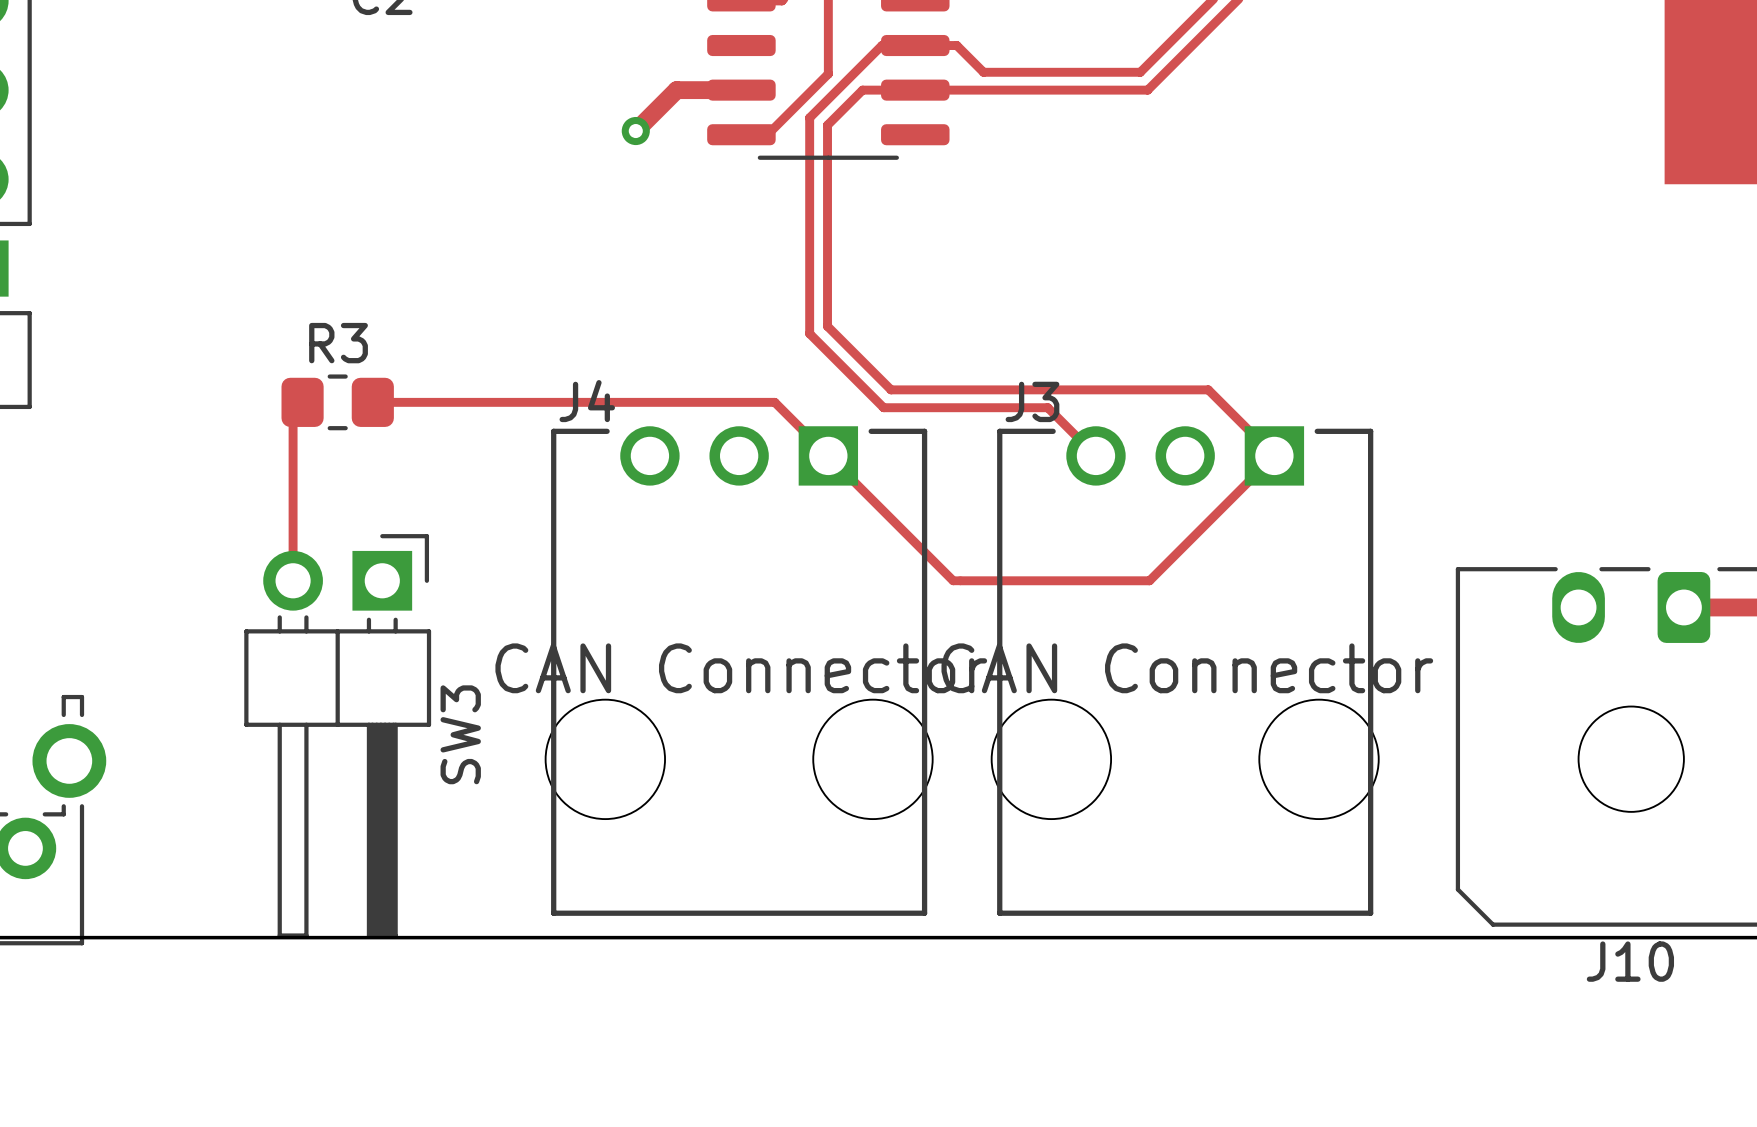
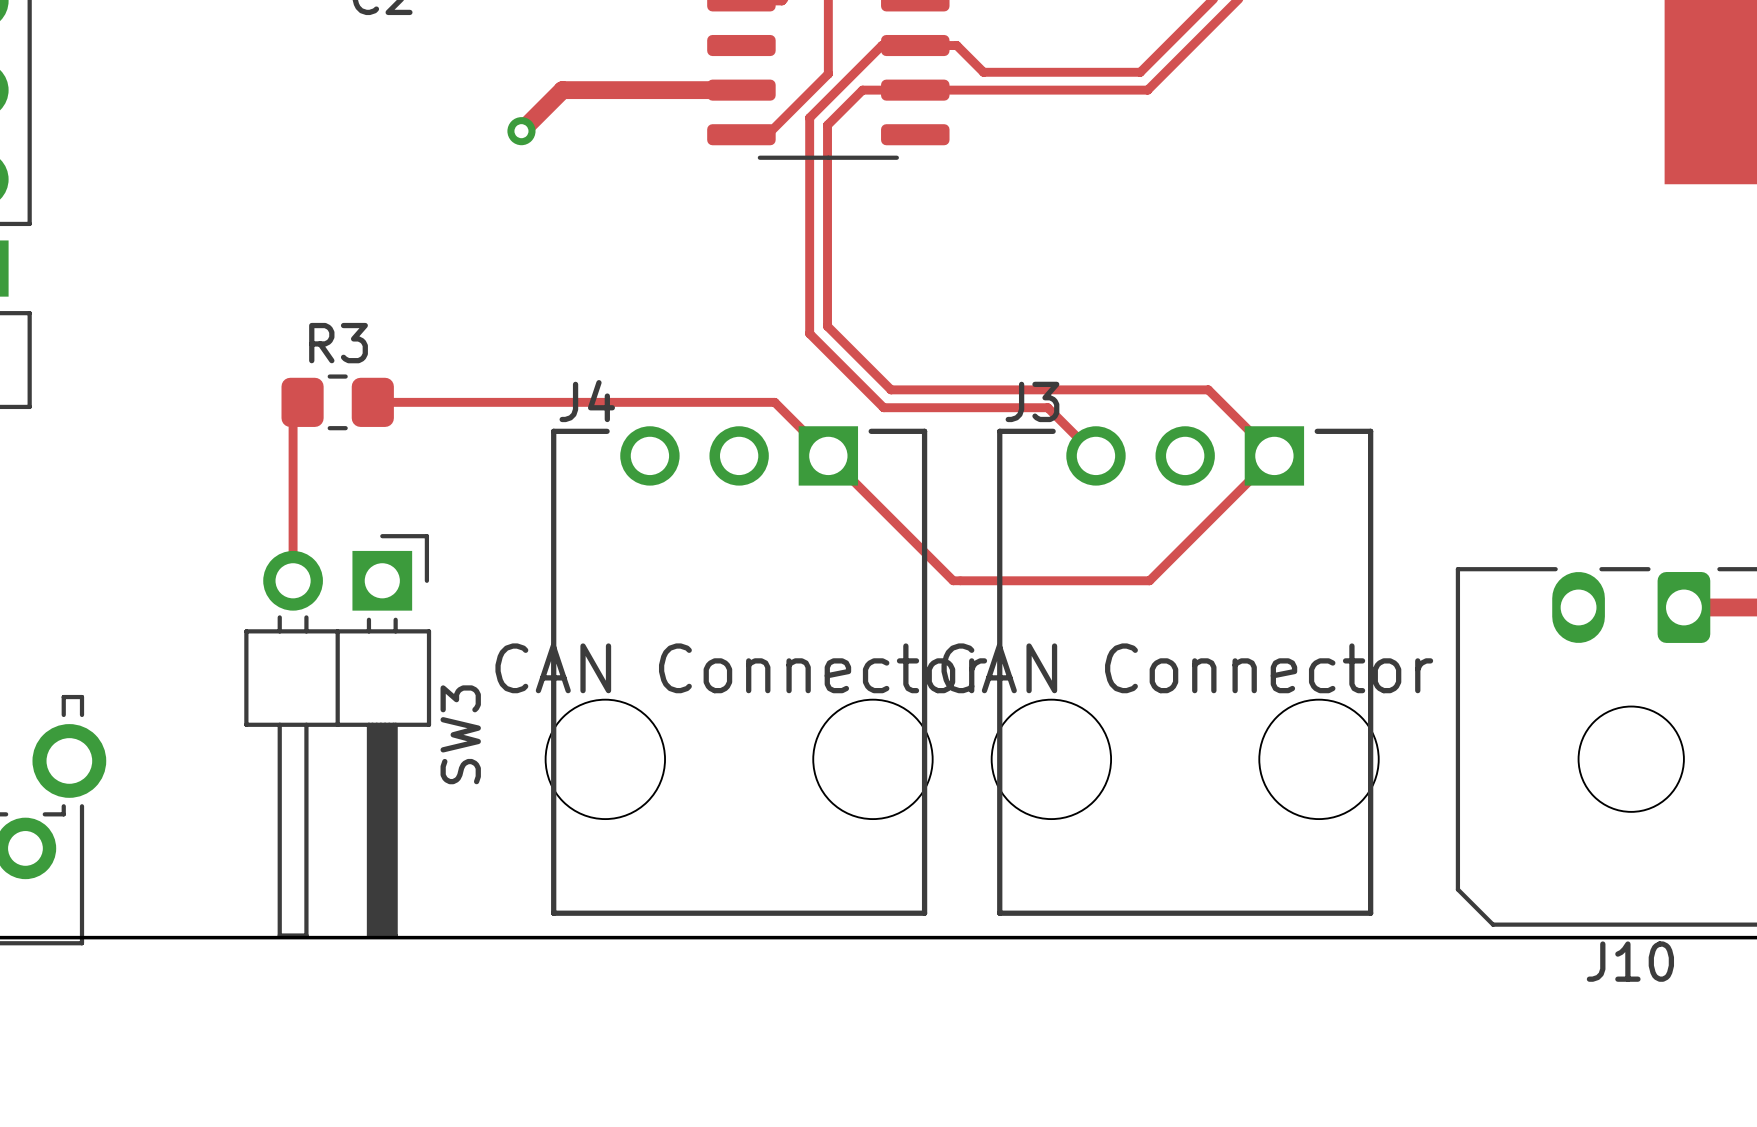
track: (676, 90) (635, 131) -> (676, 90) (562, 90) (521, 131)
via: none -> (521, 131)
via: (635, 131) -> none

